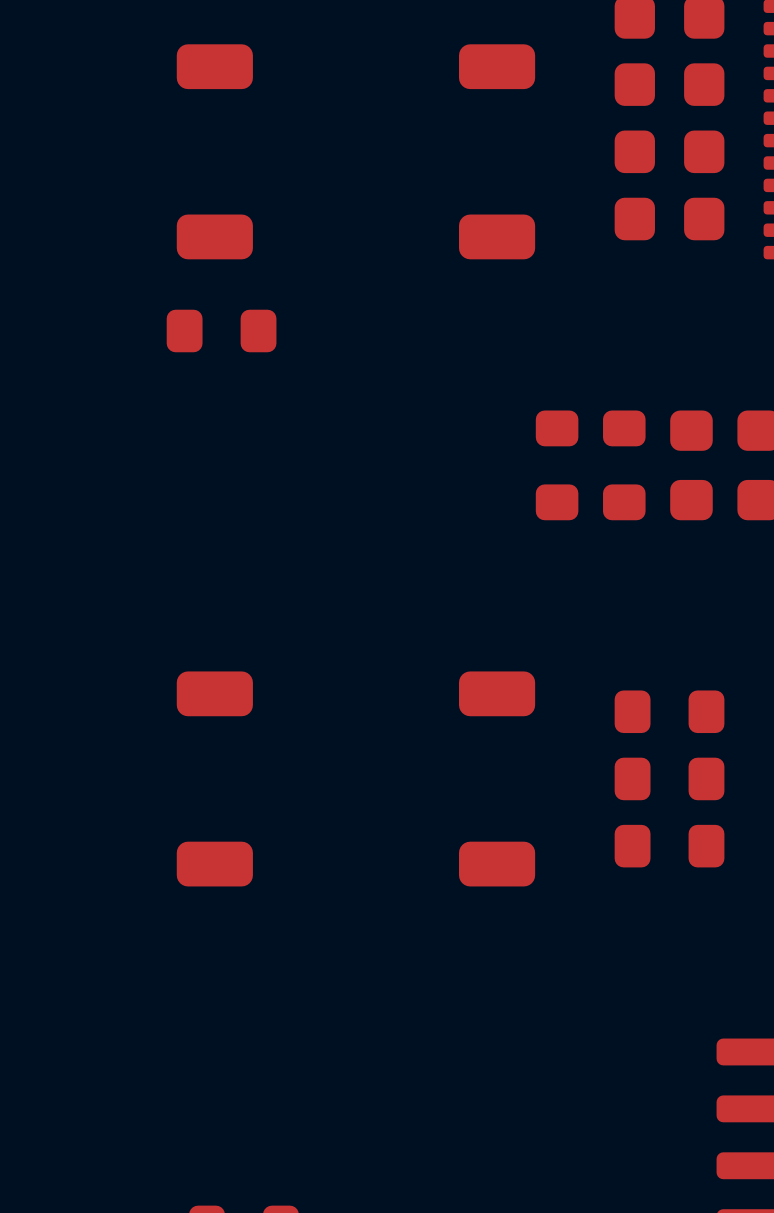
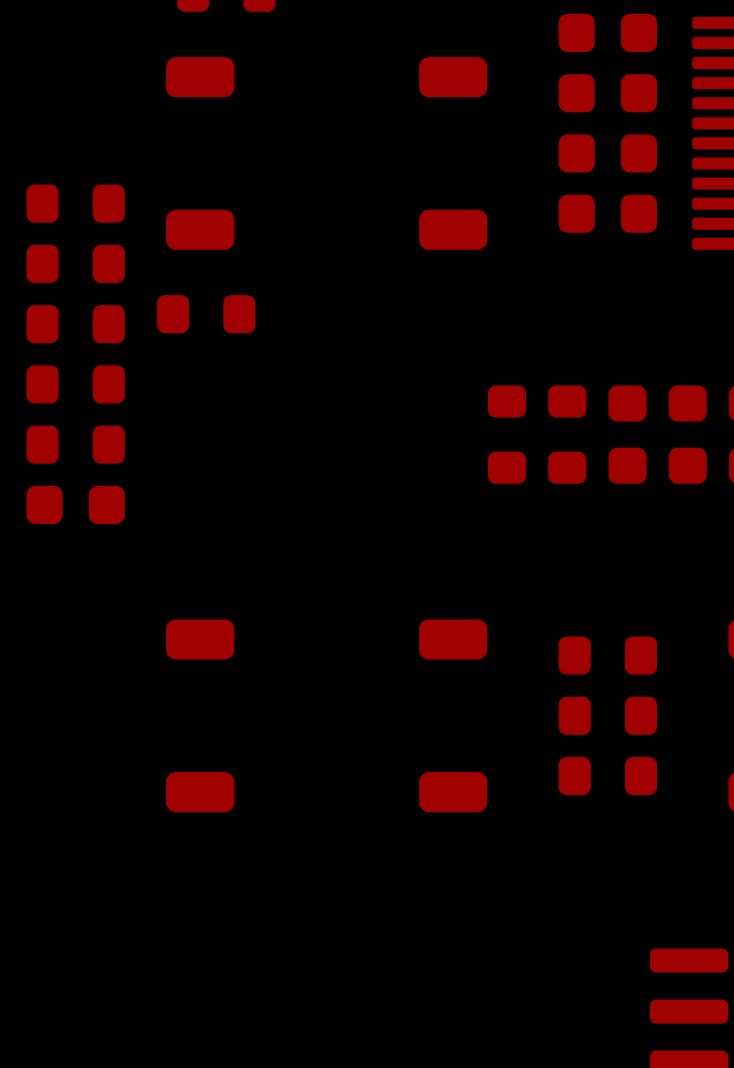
part: none -> (75, 203)
part: none -> (75, 263)
part: none -> (75, 324)
part: none -> (75, 384)
part: none -> (75, 444)
part: none -> (75, 504)

